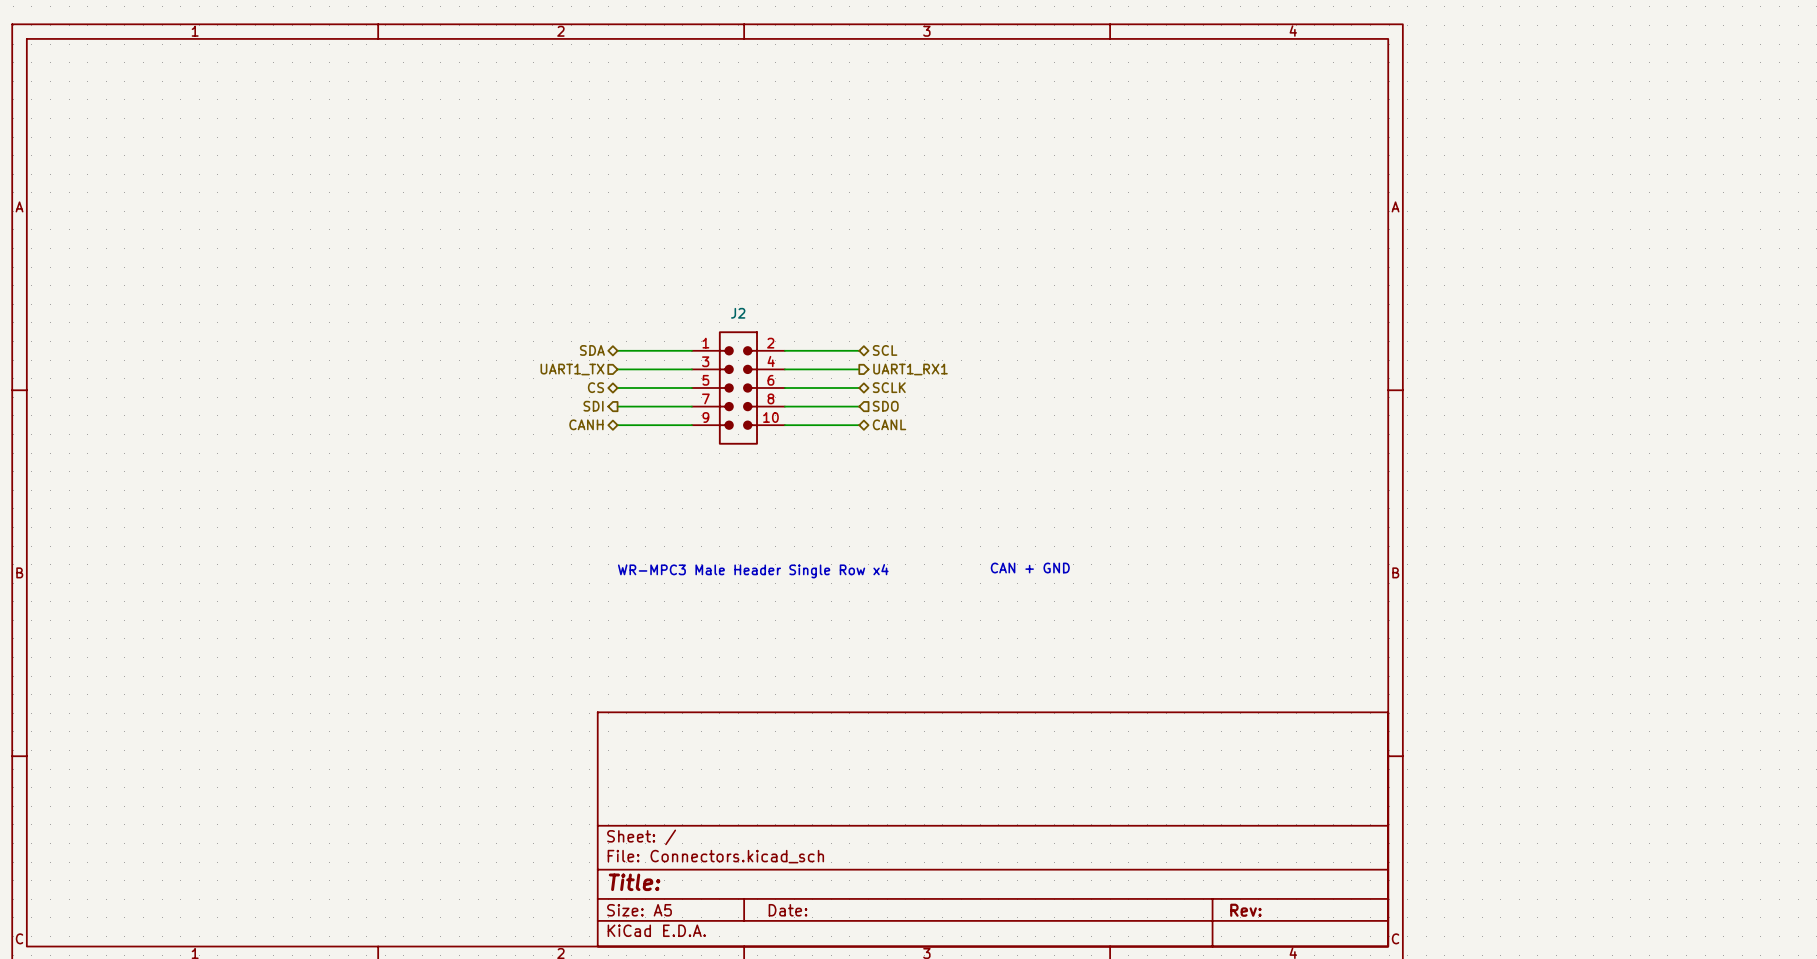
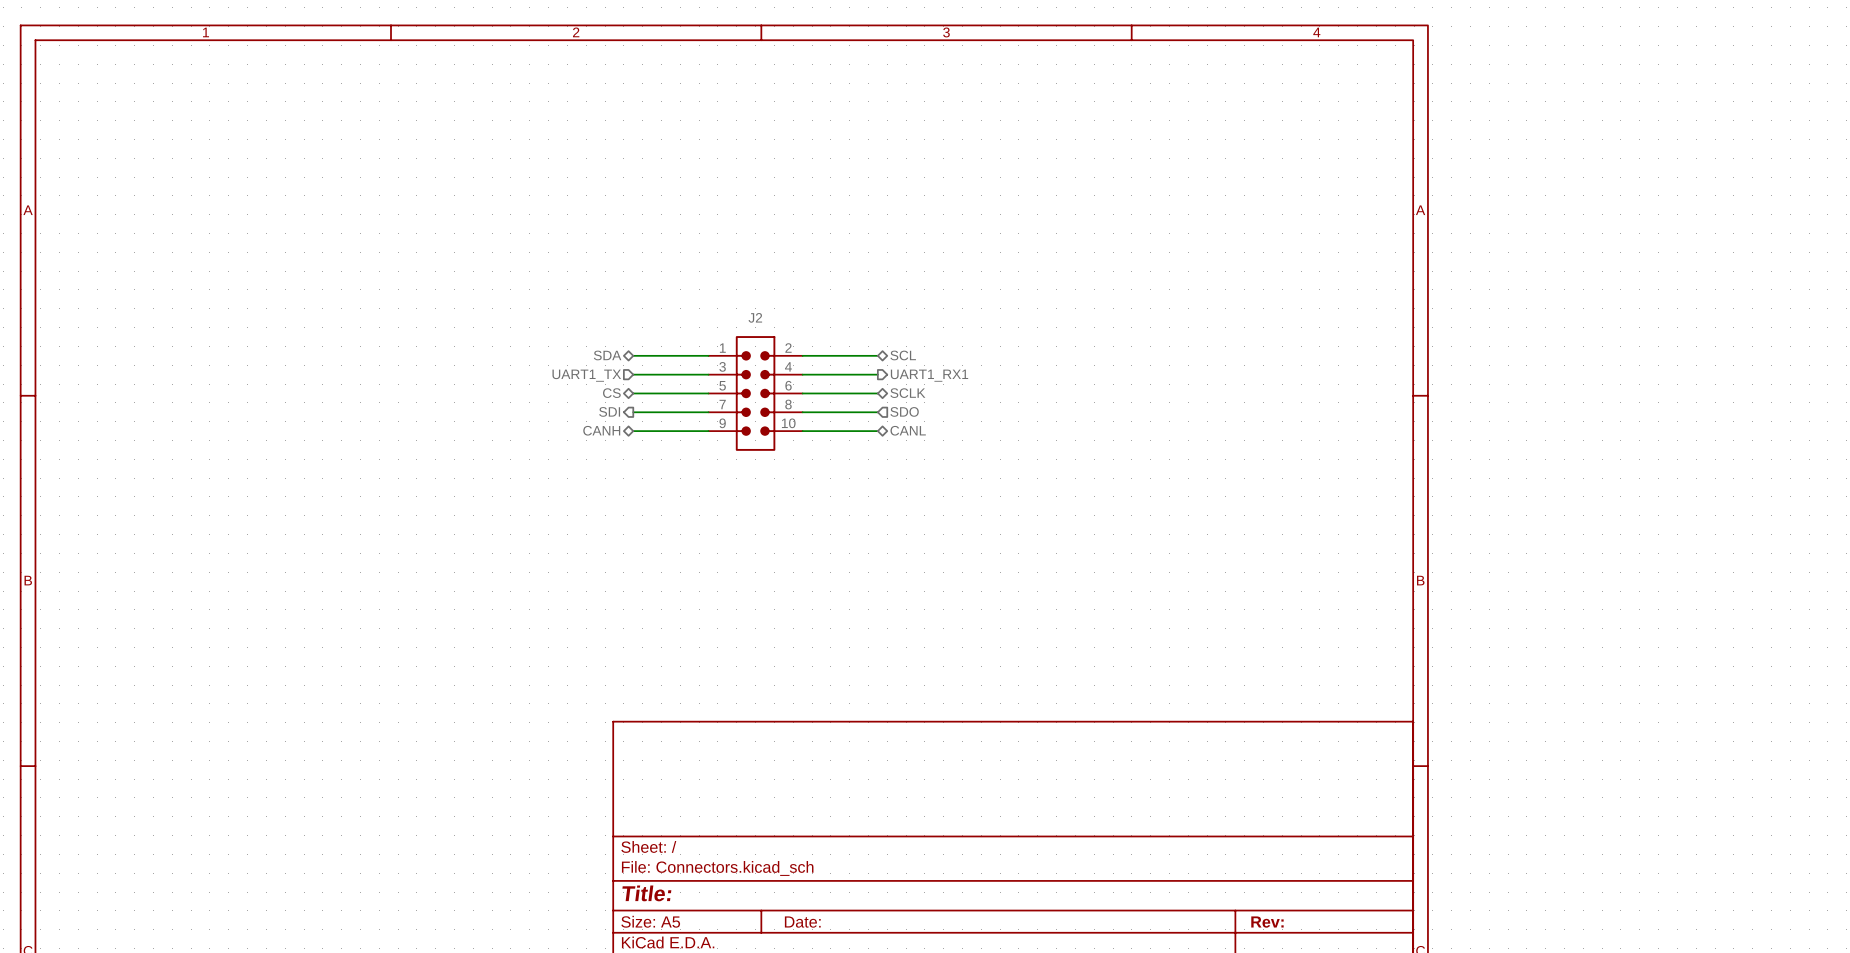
text: CAN + GND (1030, 568) -> none
text: WR-MPC3 Male Header Single Row x4 (753, 571) -> none

